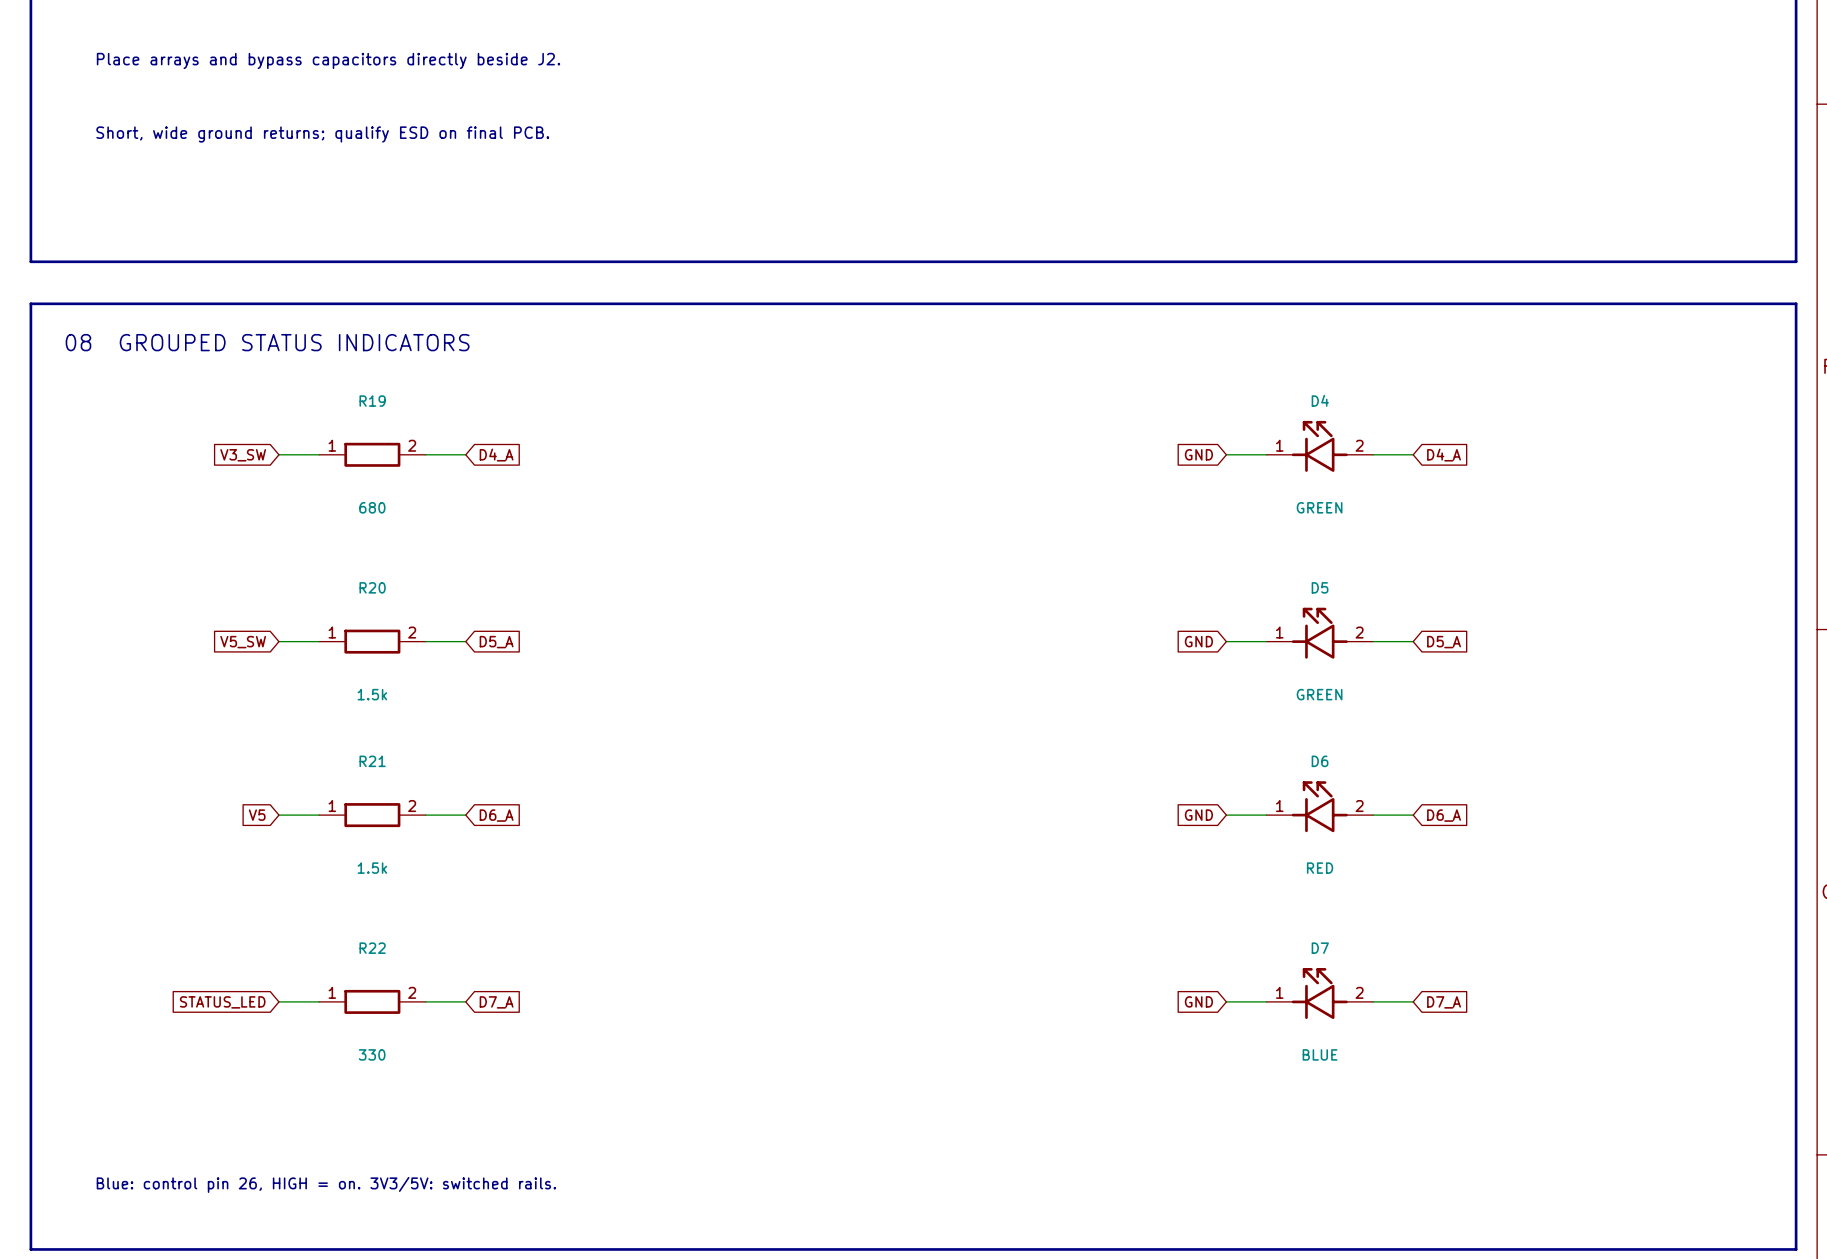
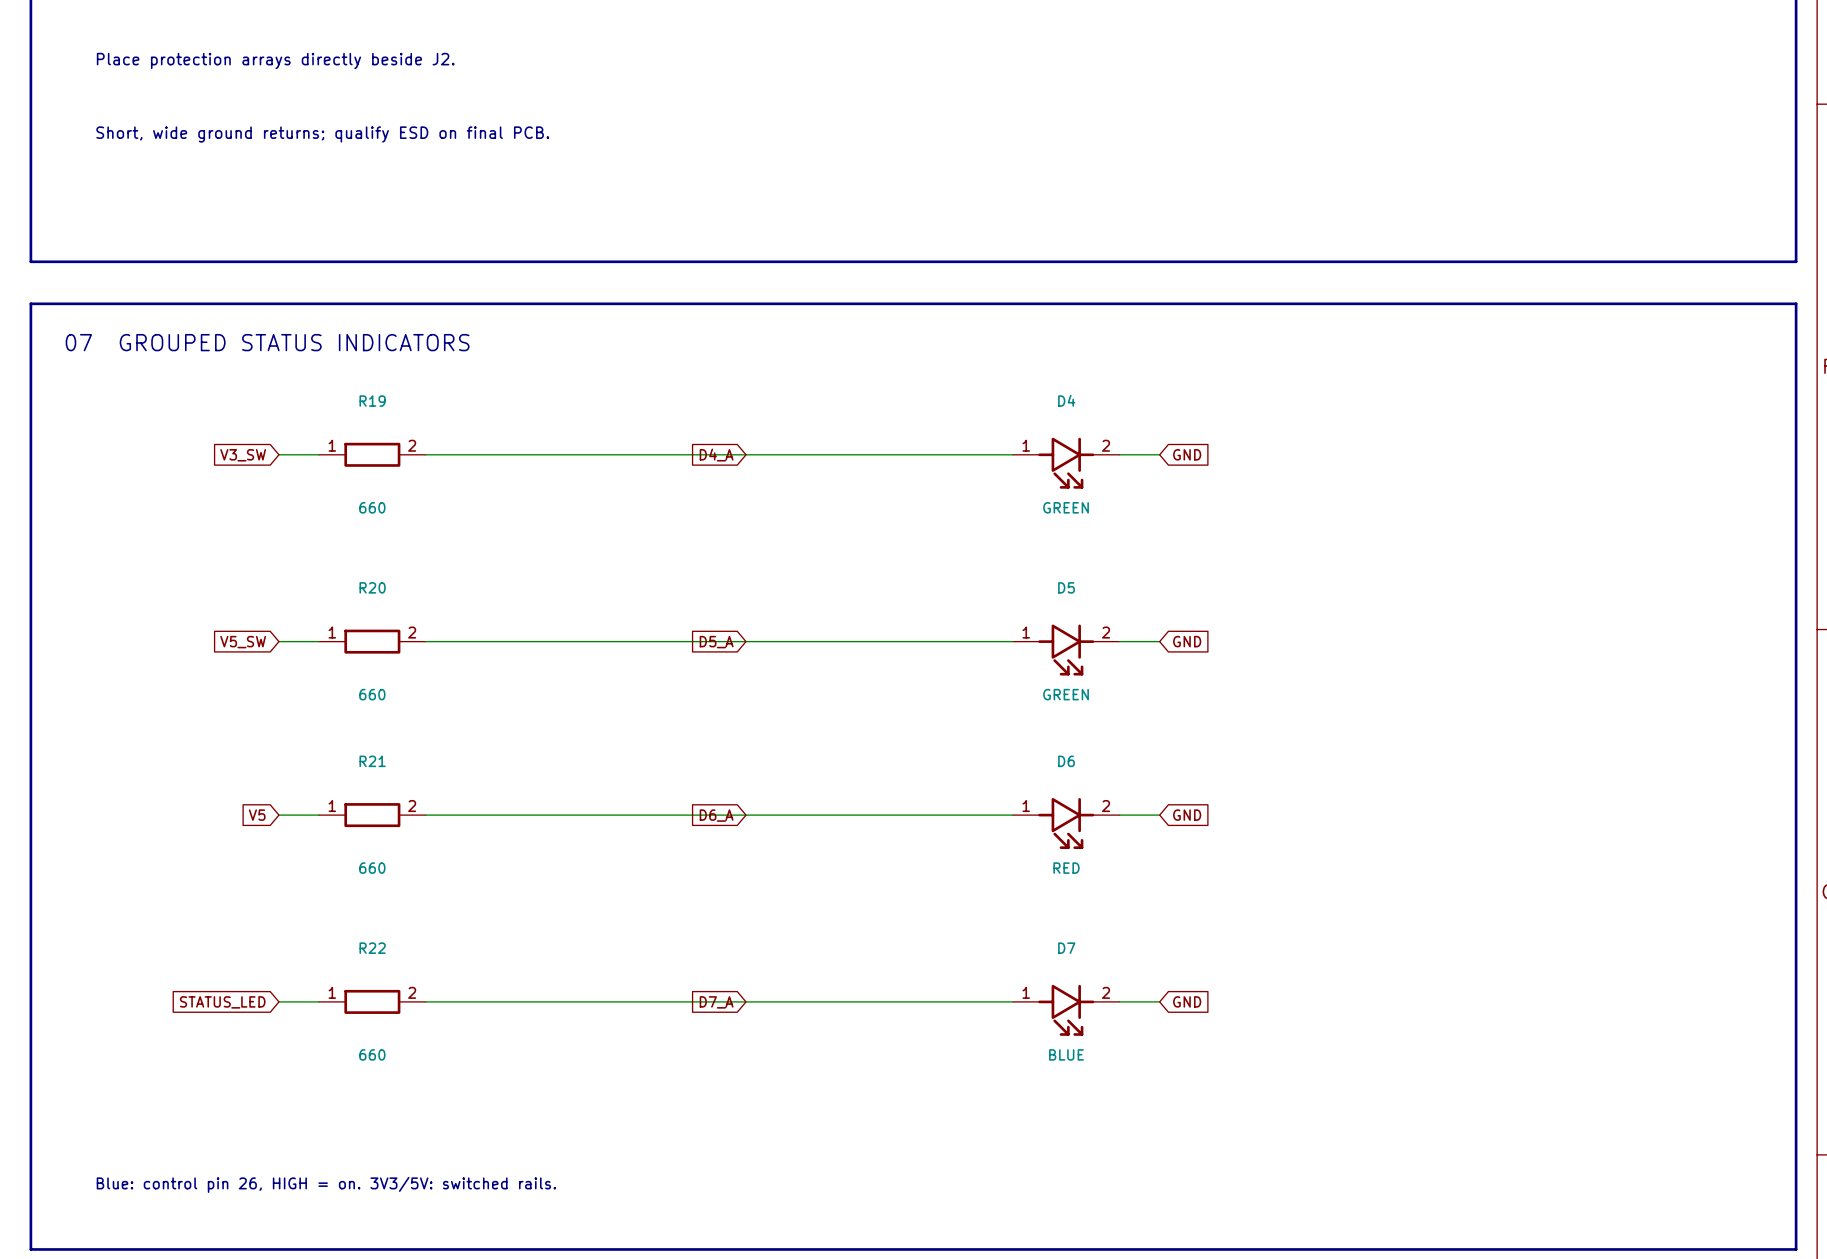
text: Place arrays and bypass capacitors directly beside J2. (328, 60) -> Place protection arrays directly beside J2. (275, 60)
text: 08 GROUPED STATUS INDICATORS (267, 342) -> 07 GROUPED STATUS INDICATORS (267, 342)
D4 symbol: [1266, 420, 1374, 472] -> [1012, 437, 1120, 489]
wire: none -> (465, 454) (1012, 454)
global label rotation: 0° (1198, 454) -> 180° (1187, 454)
wire: (1226, 454) (1266, 454) -> (1119, 454) (1159, 454)
wire: (1373, 454) (1413, 454) -> none
global label: D4_A (496, 455) -> none
global label: none -> D4_A (716, 455)
global label: D4_A (1444, 455) -> none
R19 value: 680 (372, 507) -> 660 (372, 507)
D5 symbol: [1266, 607, 1374, 659] -> [1012, 624, 1120, 676]
wire: none -> (465, 641) (1012, 641)
global label rotation: 0° (1198, 641) -> 180° (1187, 641)
wire: (1226, 641) (1266, 641) -> (1119, 641) (1159, 641)
wire: (1373, 641) (1413, 641) -> none
global label: D5_A (496, 642) -> none
global label: none -> D5_A (716, 642)
global label: D5_A (1444, 642) -> none
R20 value: 1.5k (372, 694) -> 660 (372, 694)
D6 symbol: [1266, 781, 1374, 833] -> [1012, 798, 1120, 850]
wire: none -> (465, 815) (1012, 815)
global label: D6_A (496, 815) -> none
global label: none -> D6_A (716, 815)
global label rotation: 0° (1198, 815) -> 180° (1187, 815)
wire: (1226, 815) (1266, 815) -> (1119, 815) (1159, 815)
wire: (1373, 815) (1413, 815) -> none
global label: D6_A (1444, 815) -> none
R21 value: 1.5k (372, 868) -> 660 (372, 868)
D7 symbol: [1266, 968, 1374, 1020] -> [1012, 984, 1120, 1036]
wire: none -> (465, 1001) (1012, 1001)
global label rotation: 0° (1198, 1001) -> 180° (1187, 1001)
wire: (1226, 1001) (1266, 1001) -> (1119, 1001) (1159, 1001)
wire: (1373, 1001) (1413, 1001) -> none
global label: D7_A (496, 1002) -> none
global label: none -> D7_A (716, 1002)
global label: D7_A (1444, 1002) -> none
R22 value: 330 (372, 1054) -> 660 (372, 1054)

